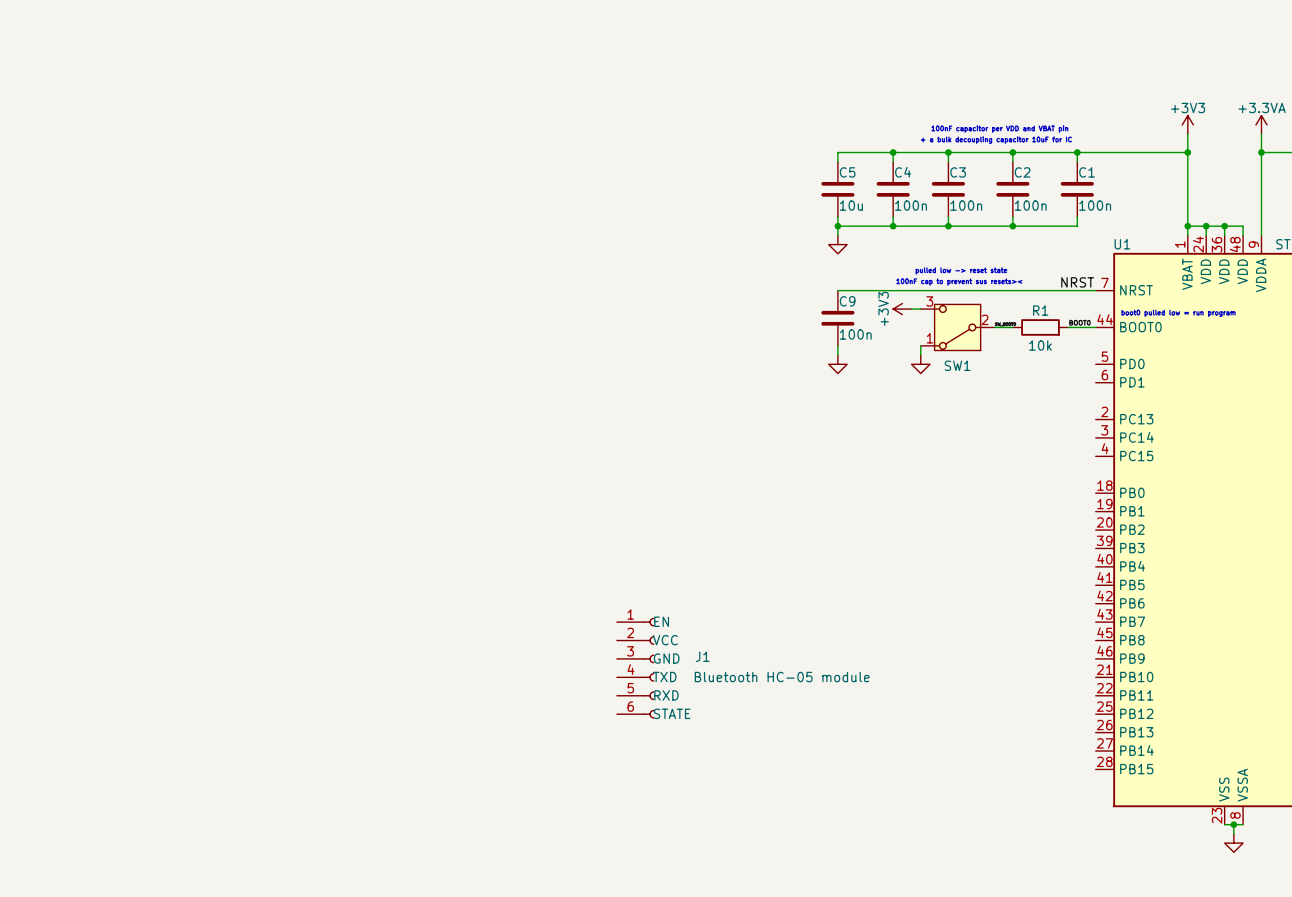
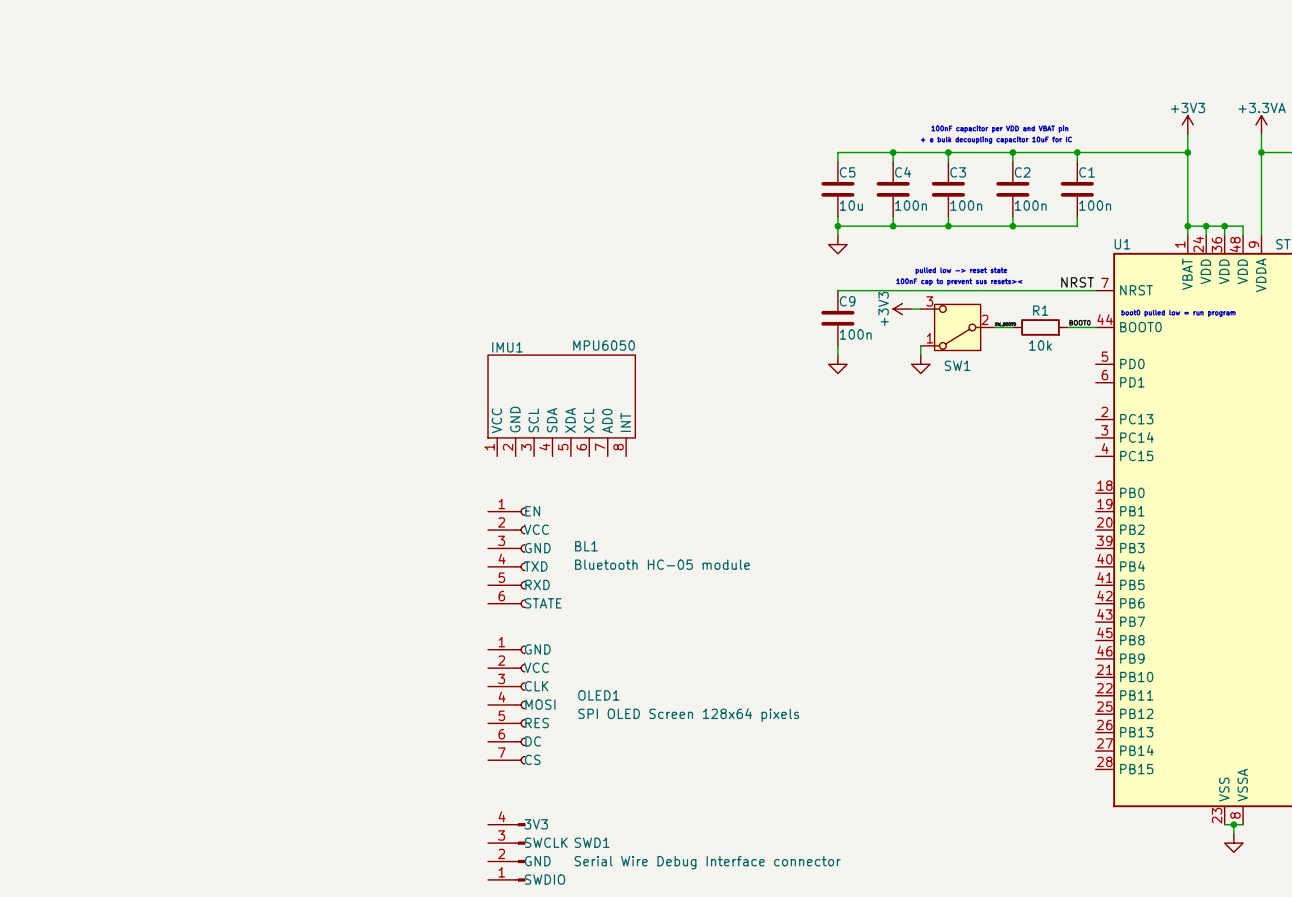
IMU1: none -> MPU6050 (561, 405)
BL1: none -> Bluetooth HC-05 module (506, 557)
J1: Bluetooth HC-05 module (635, 668) -> none
OLED1: none -> SPI OLED Screen 128x64 pixels (506, 704)
SWD1: none -> Serial Wire Debug Interface connector (506, 852)

